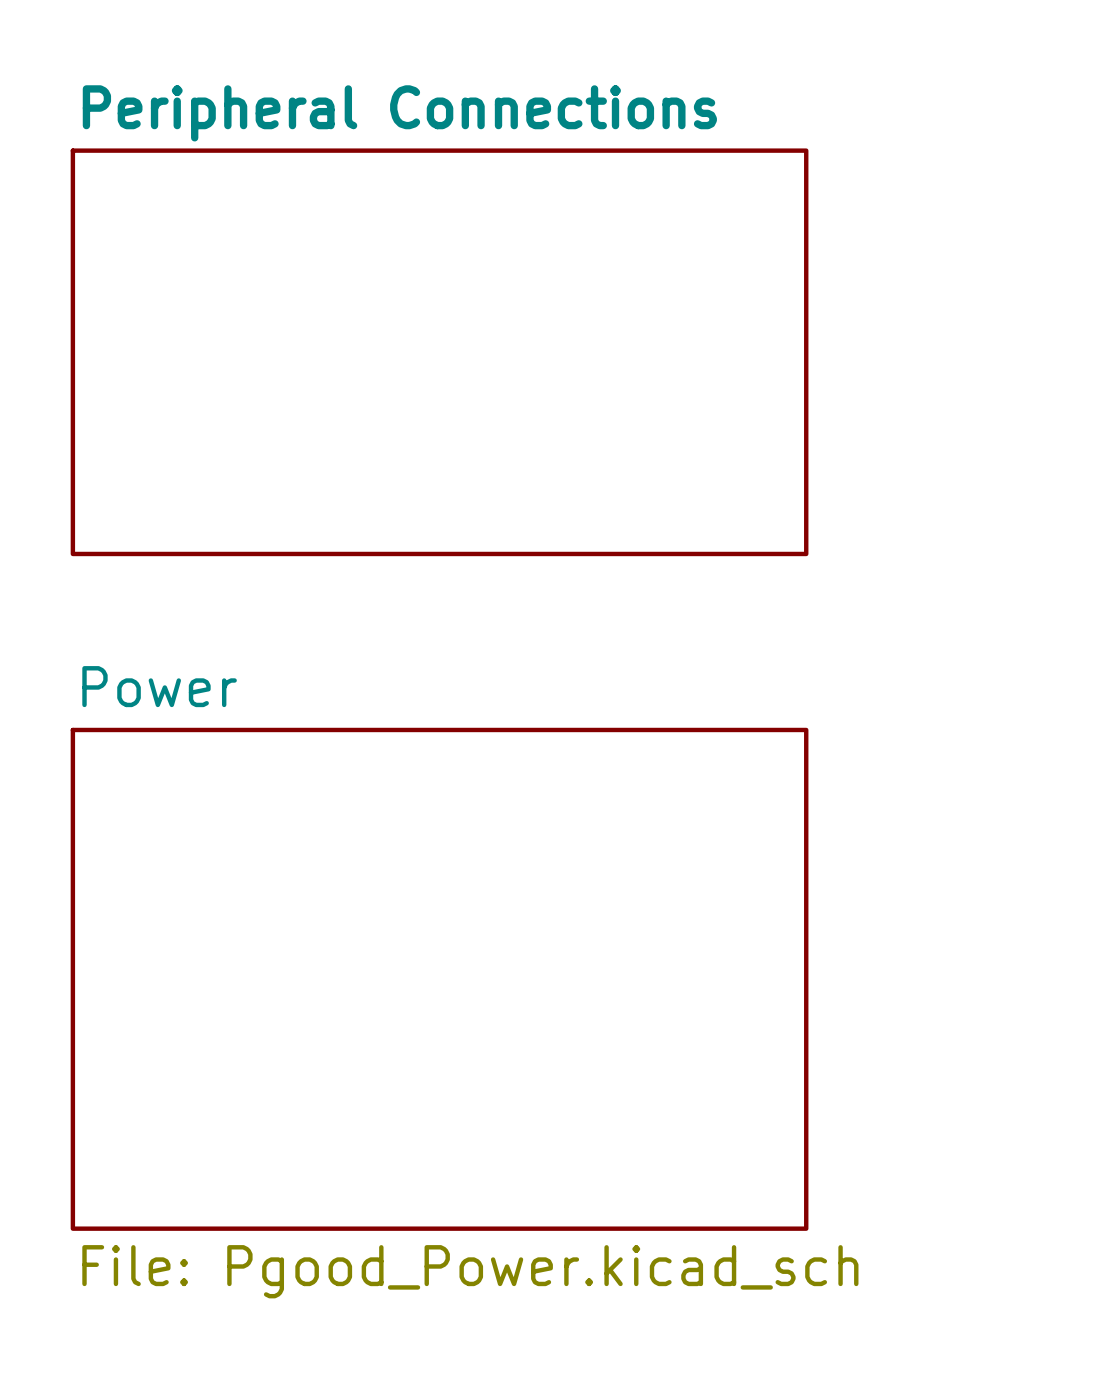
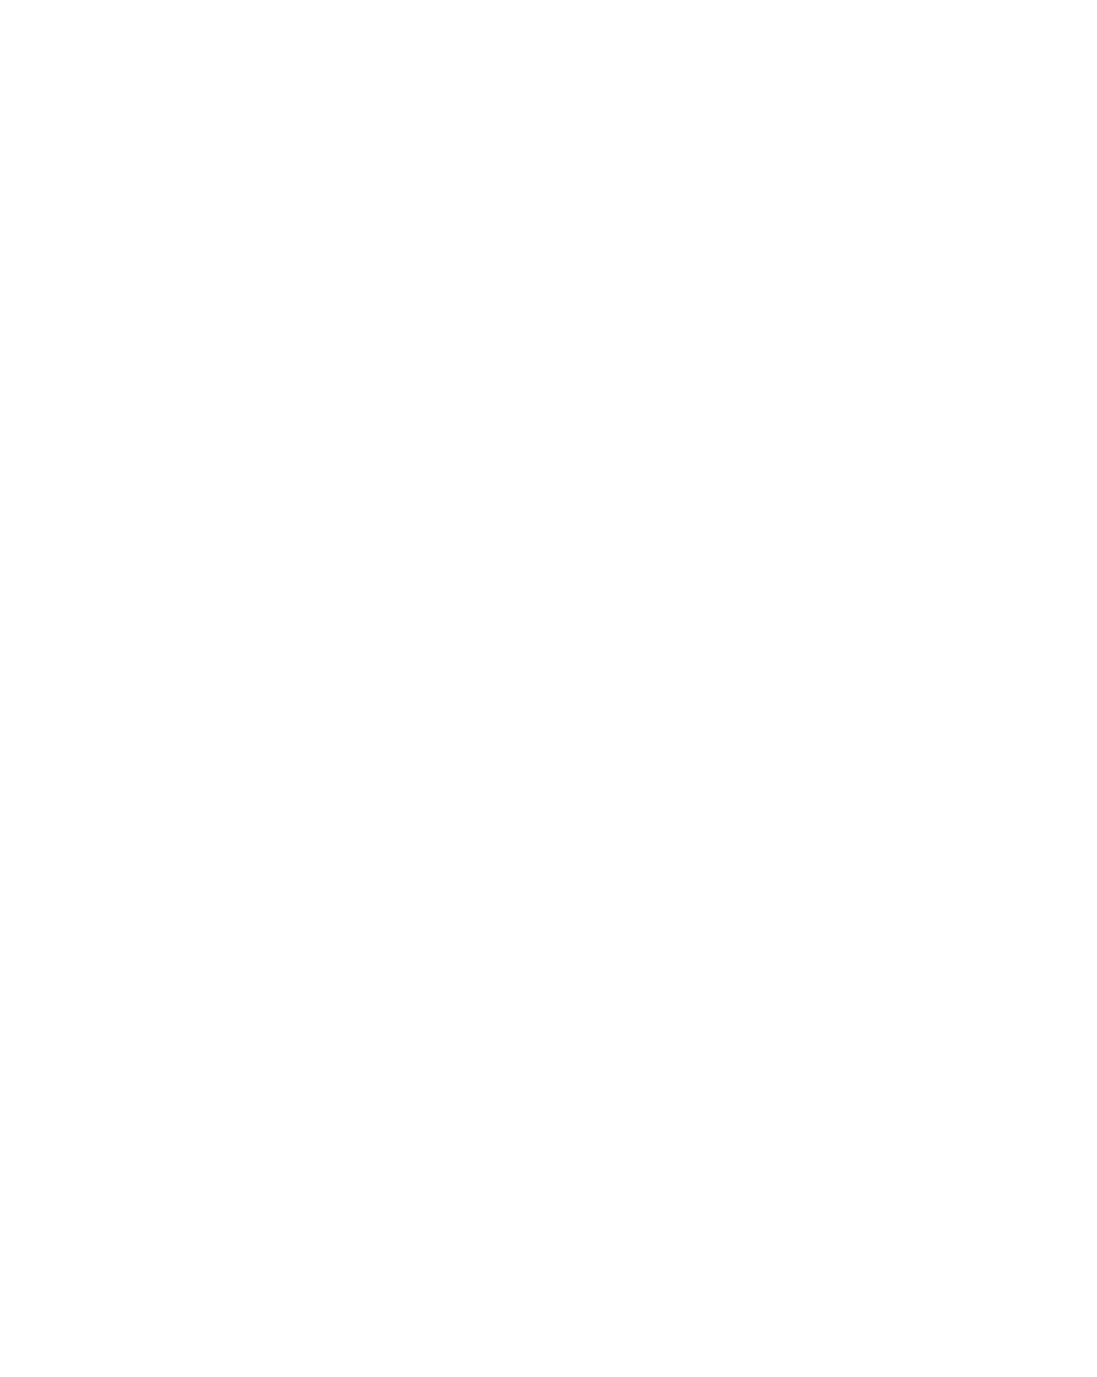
sheet Peripheral Connections: (439, 352) -> none
sheet Power: File: Pgood_Power.kicad_sch (439, 979) -> none

